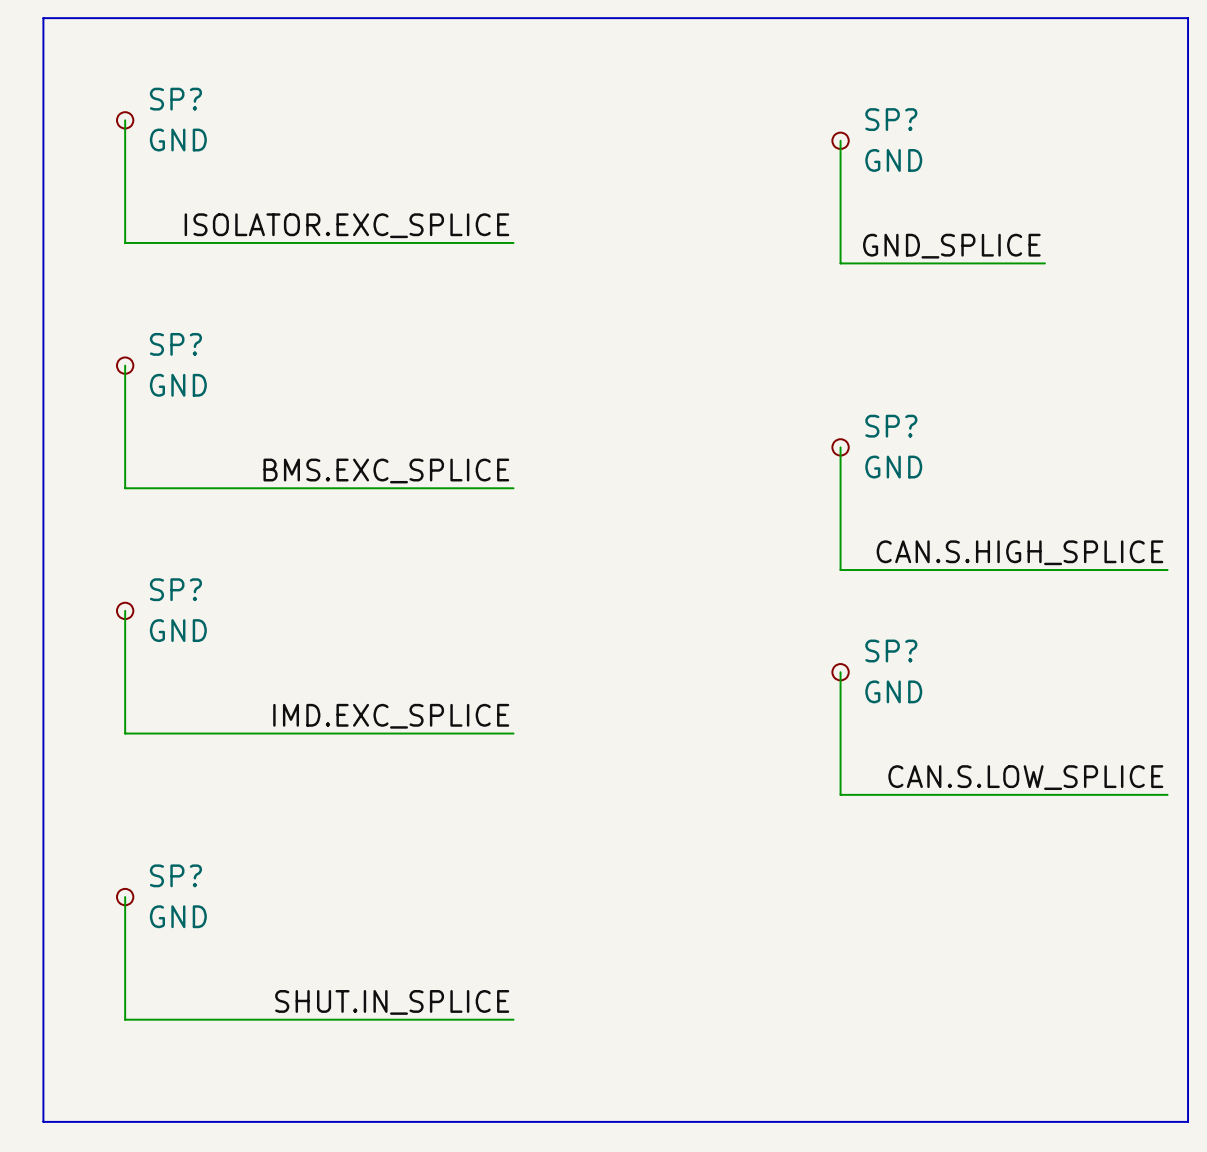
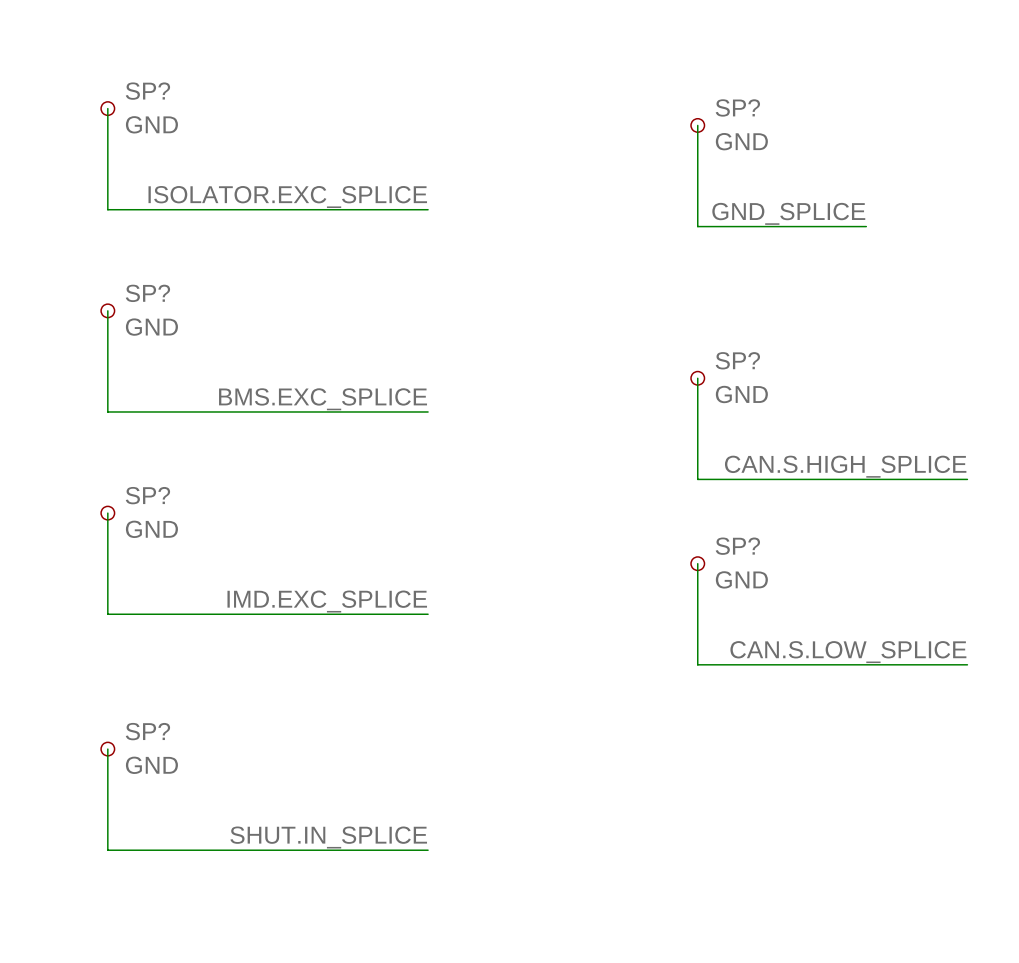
line: (43, 18) (1188, 18) (1188, 1121) (43, 1121) (43, 18) -> none

